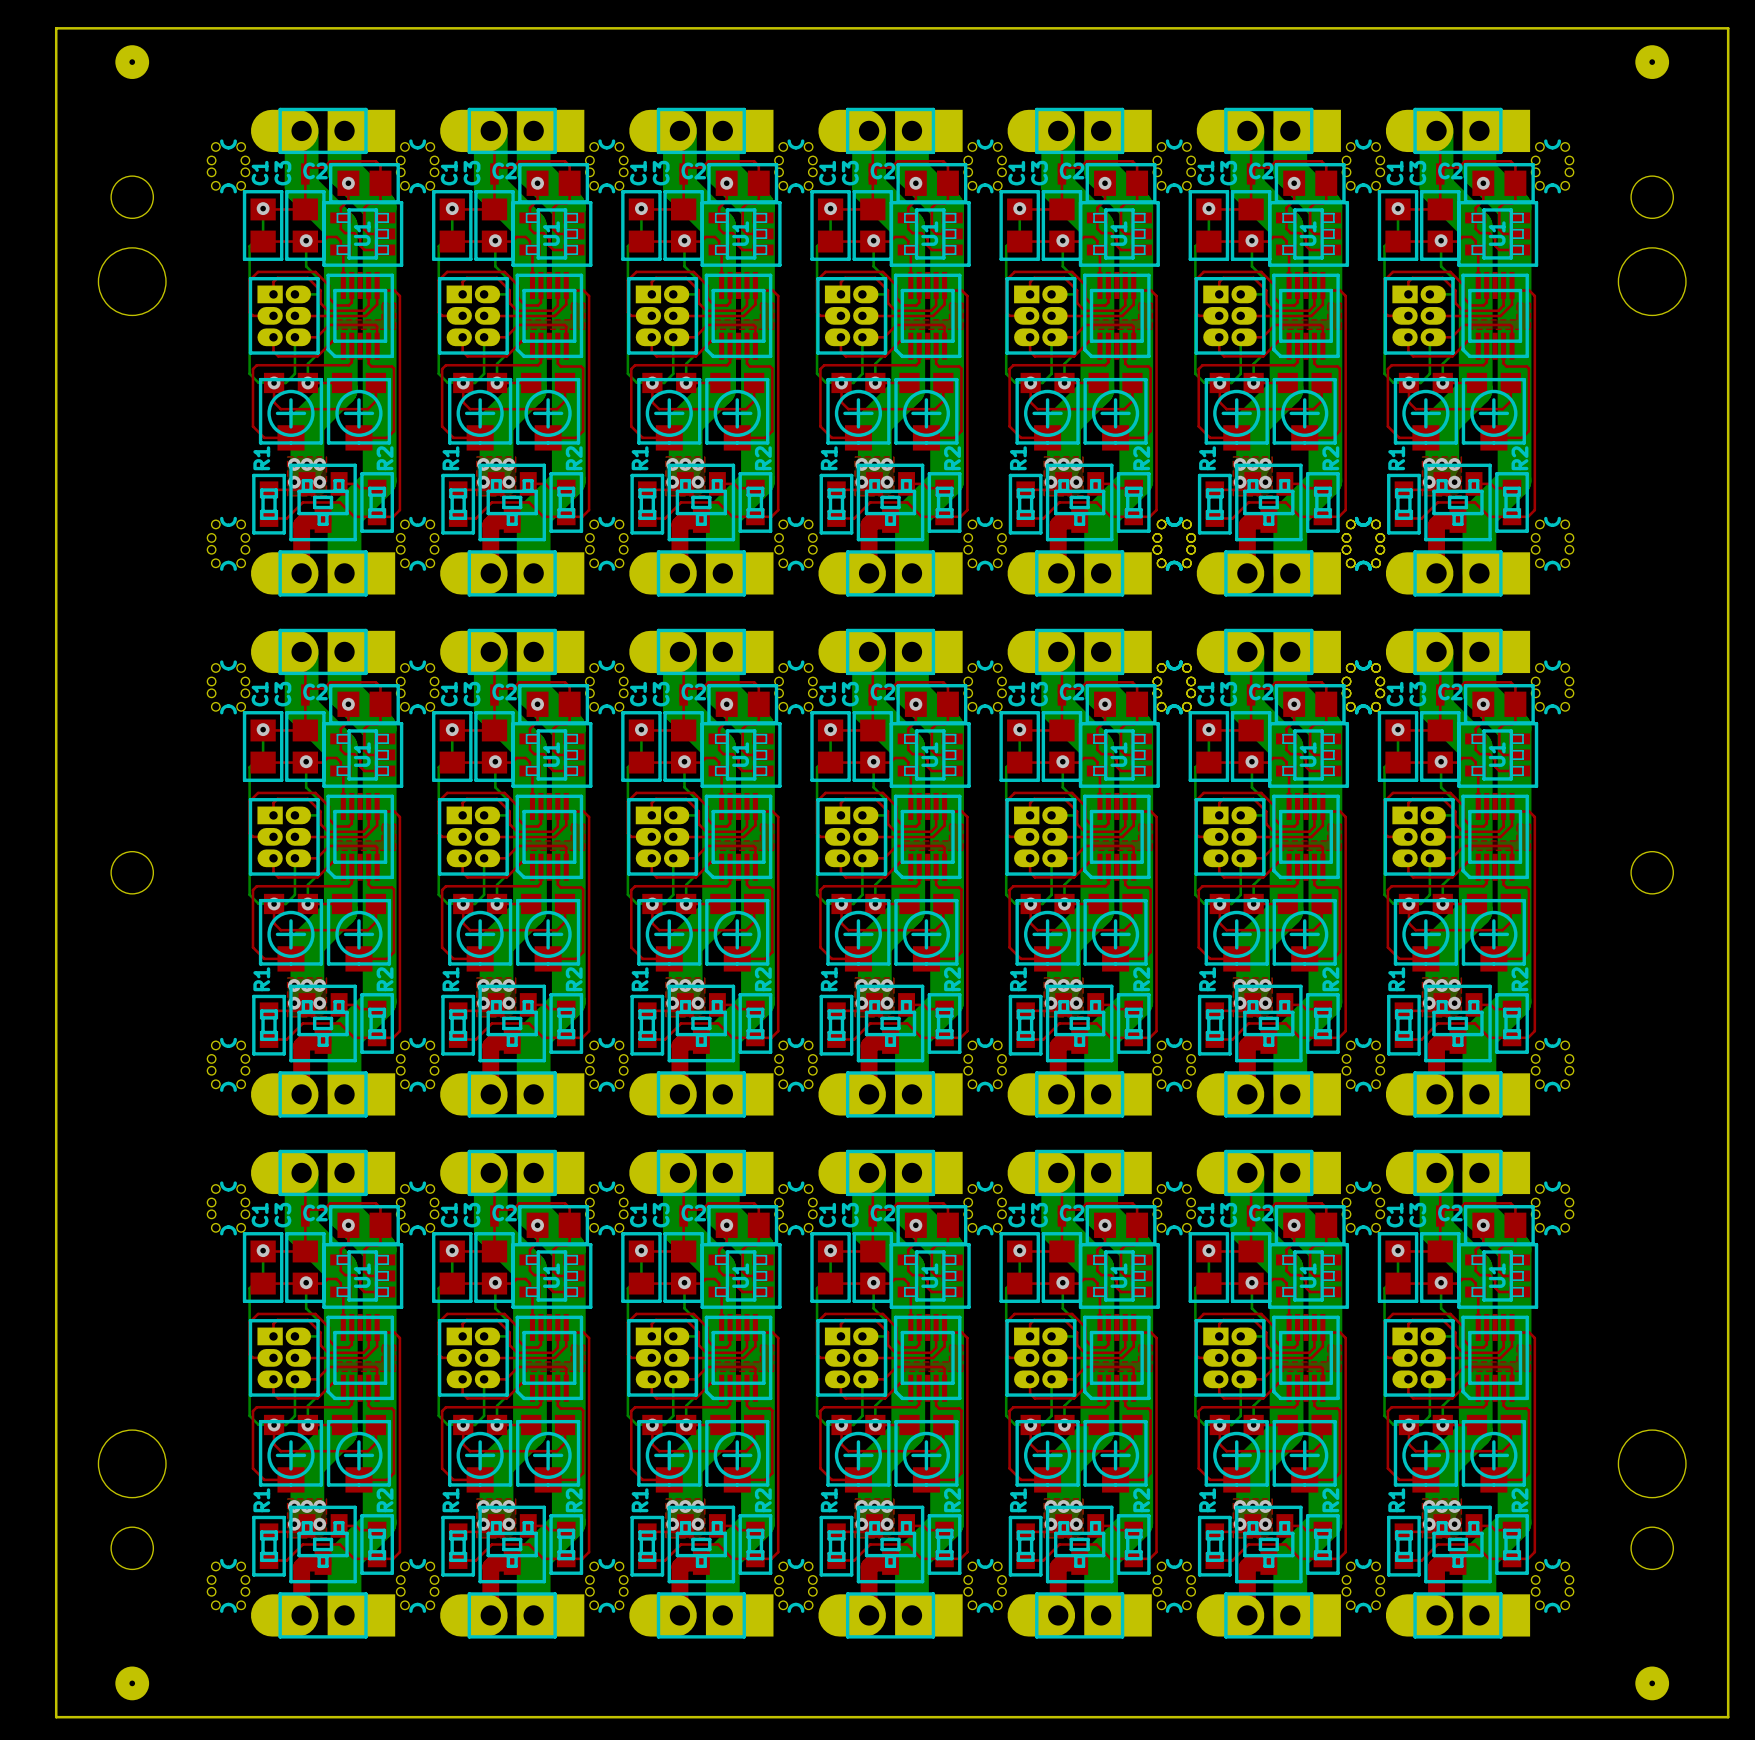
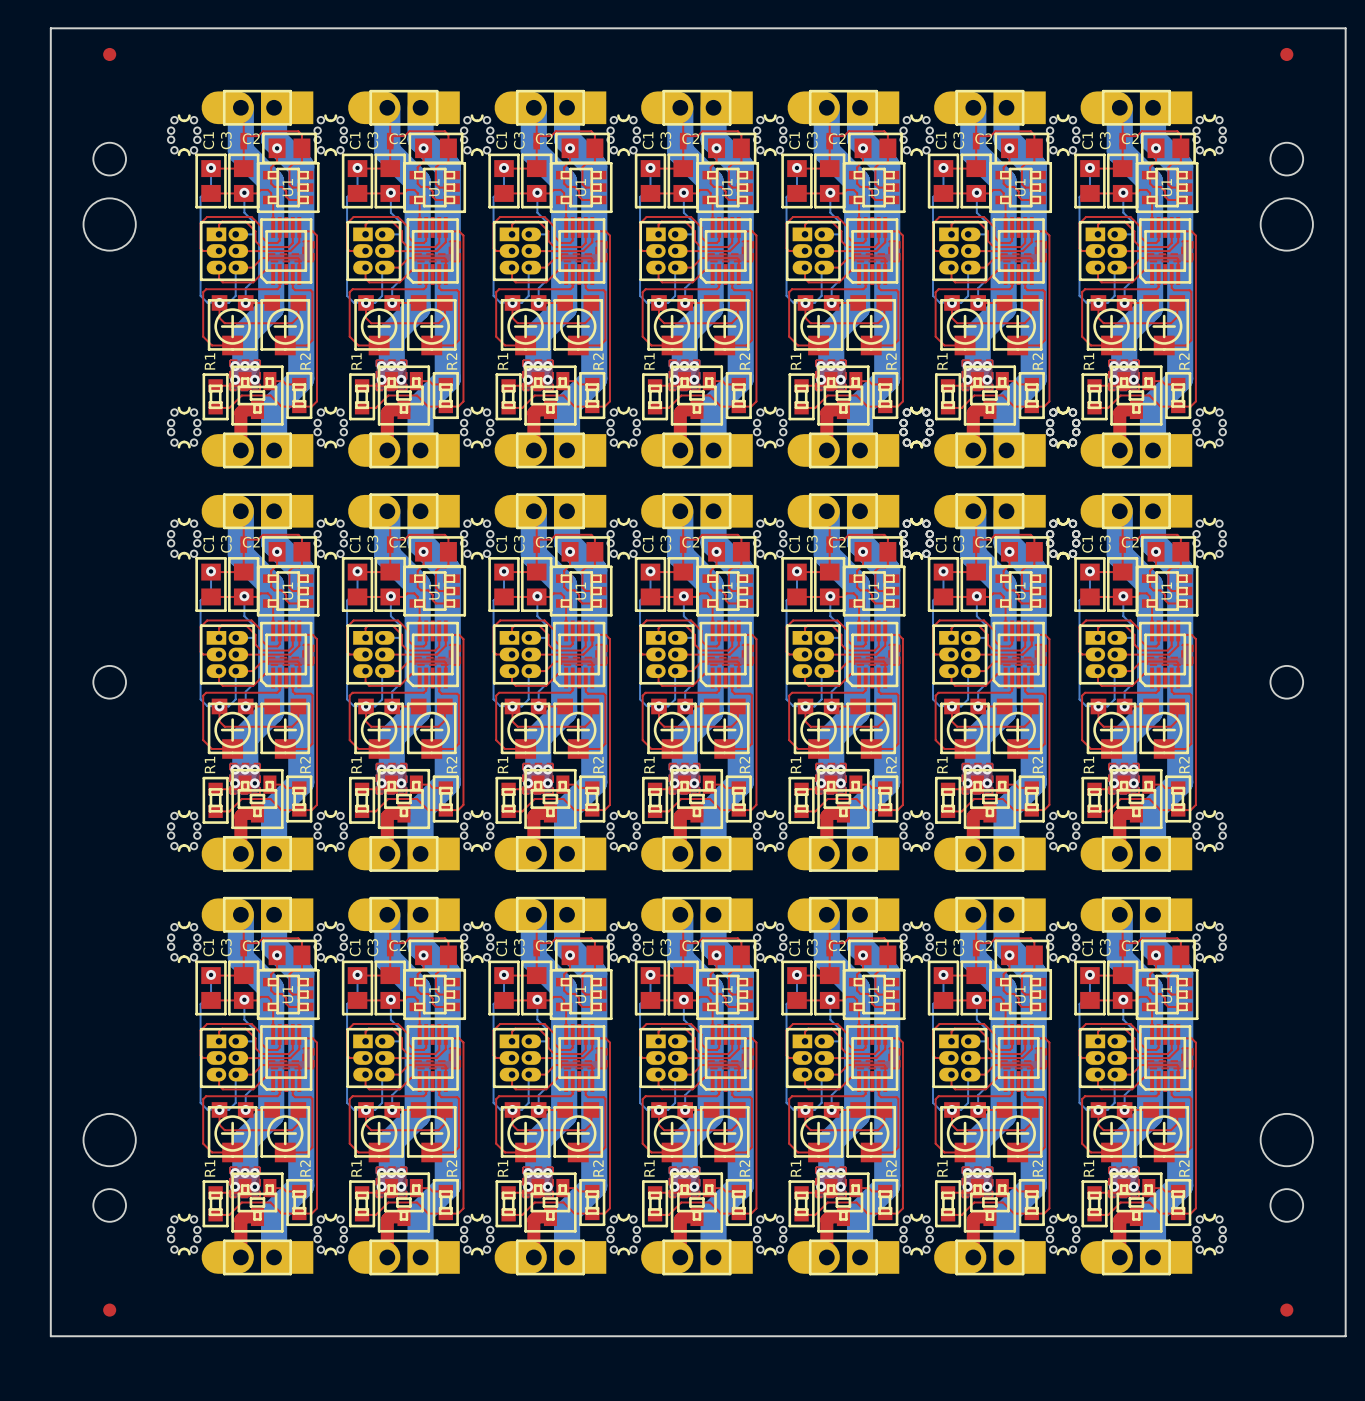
part footprint: [115, 45, 150, 79] -> [103, 47, 117, 62]
part footprint: [1635, 45, 1670, 79] -> [1280, 47, 1294, 62]
part footprint: [115, 1666, 150, 1701] -> [103, 1303, 117, 1317]
part footprint: [1635, 1666, 1670, 1701] -> [1280, 1303, 1294, 1317]

